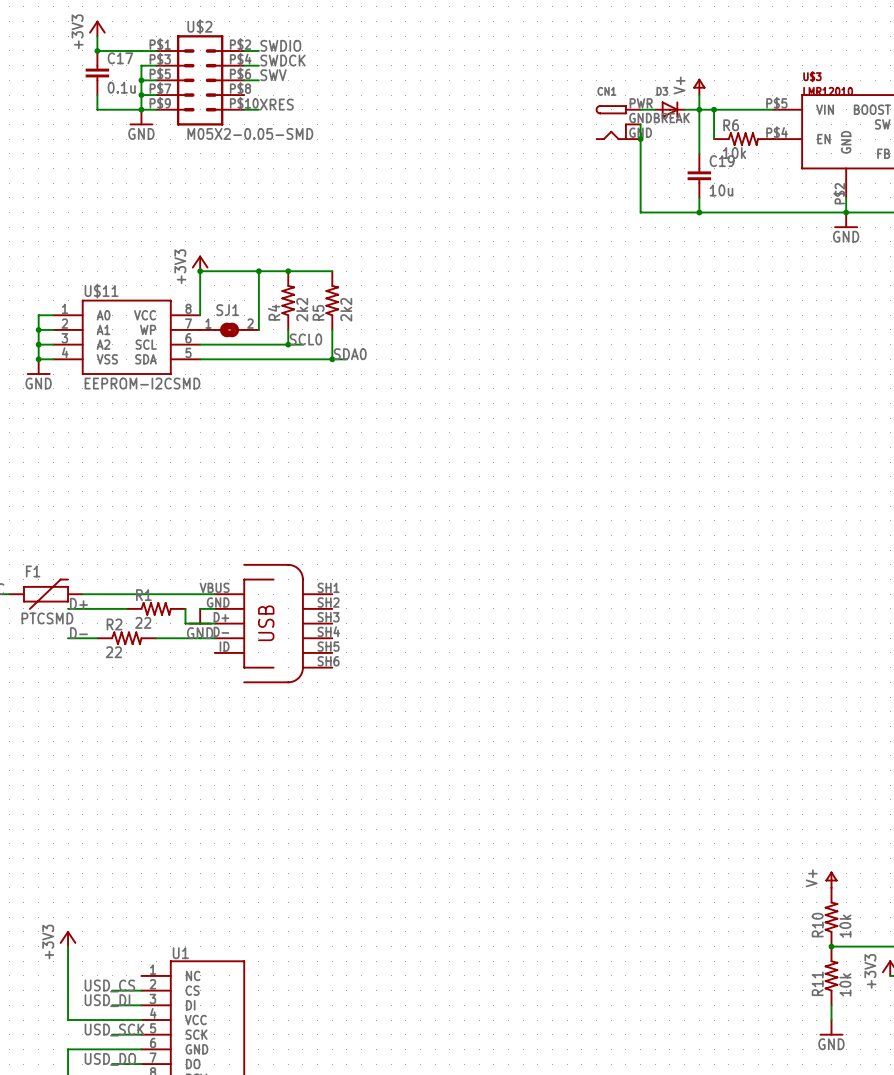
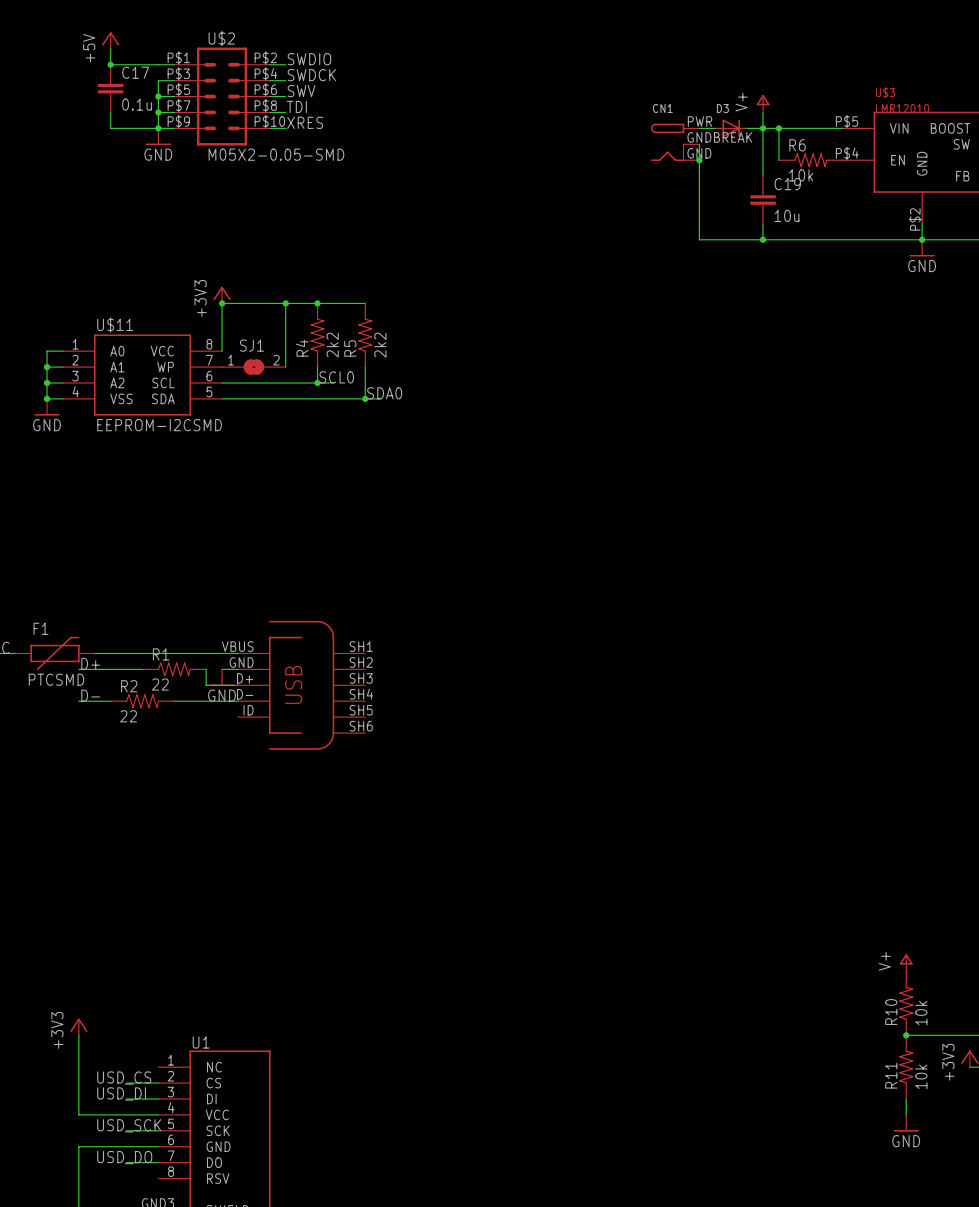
power symbol: +3V3 (97, 28) -> +5V (110, 40)
label: none -> TDI (296, 106)
wire: none -> (269, 112) (285, 112)

